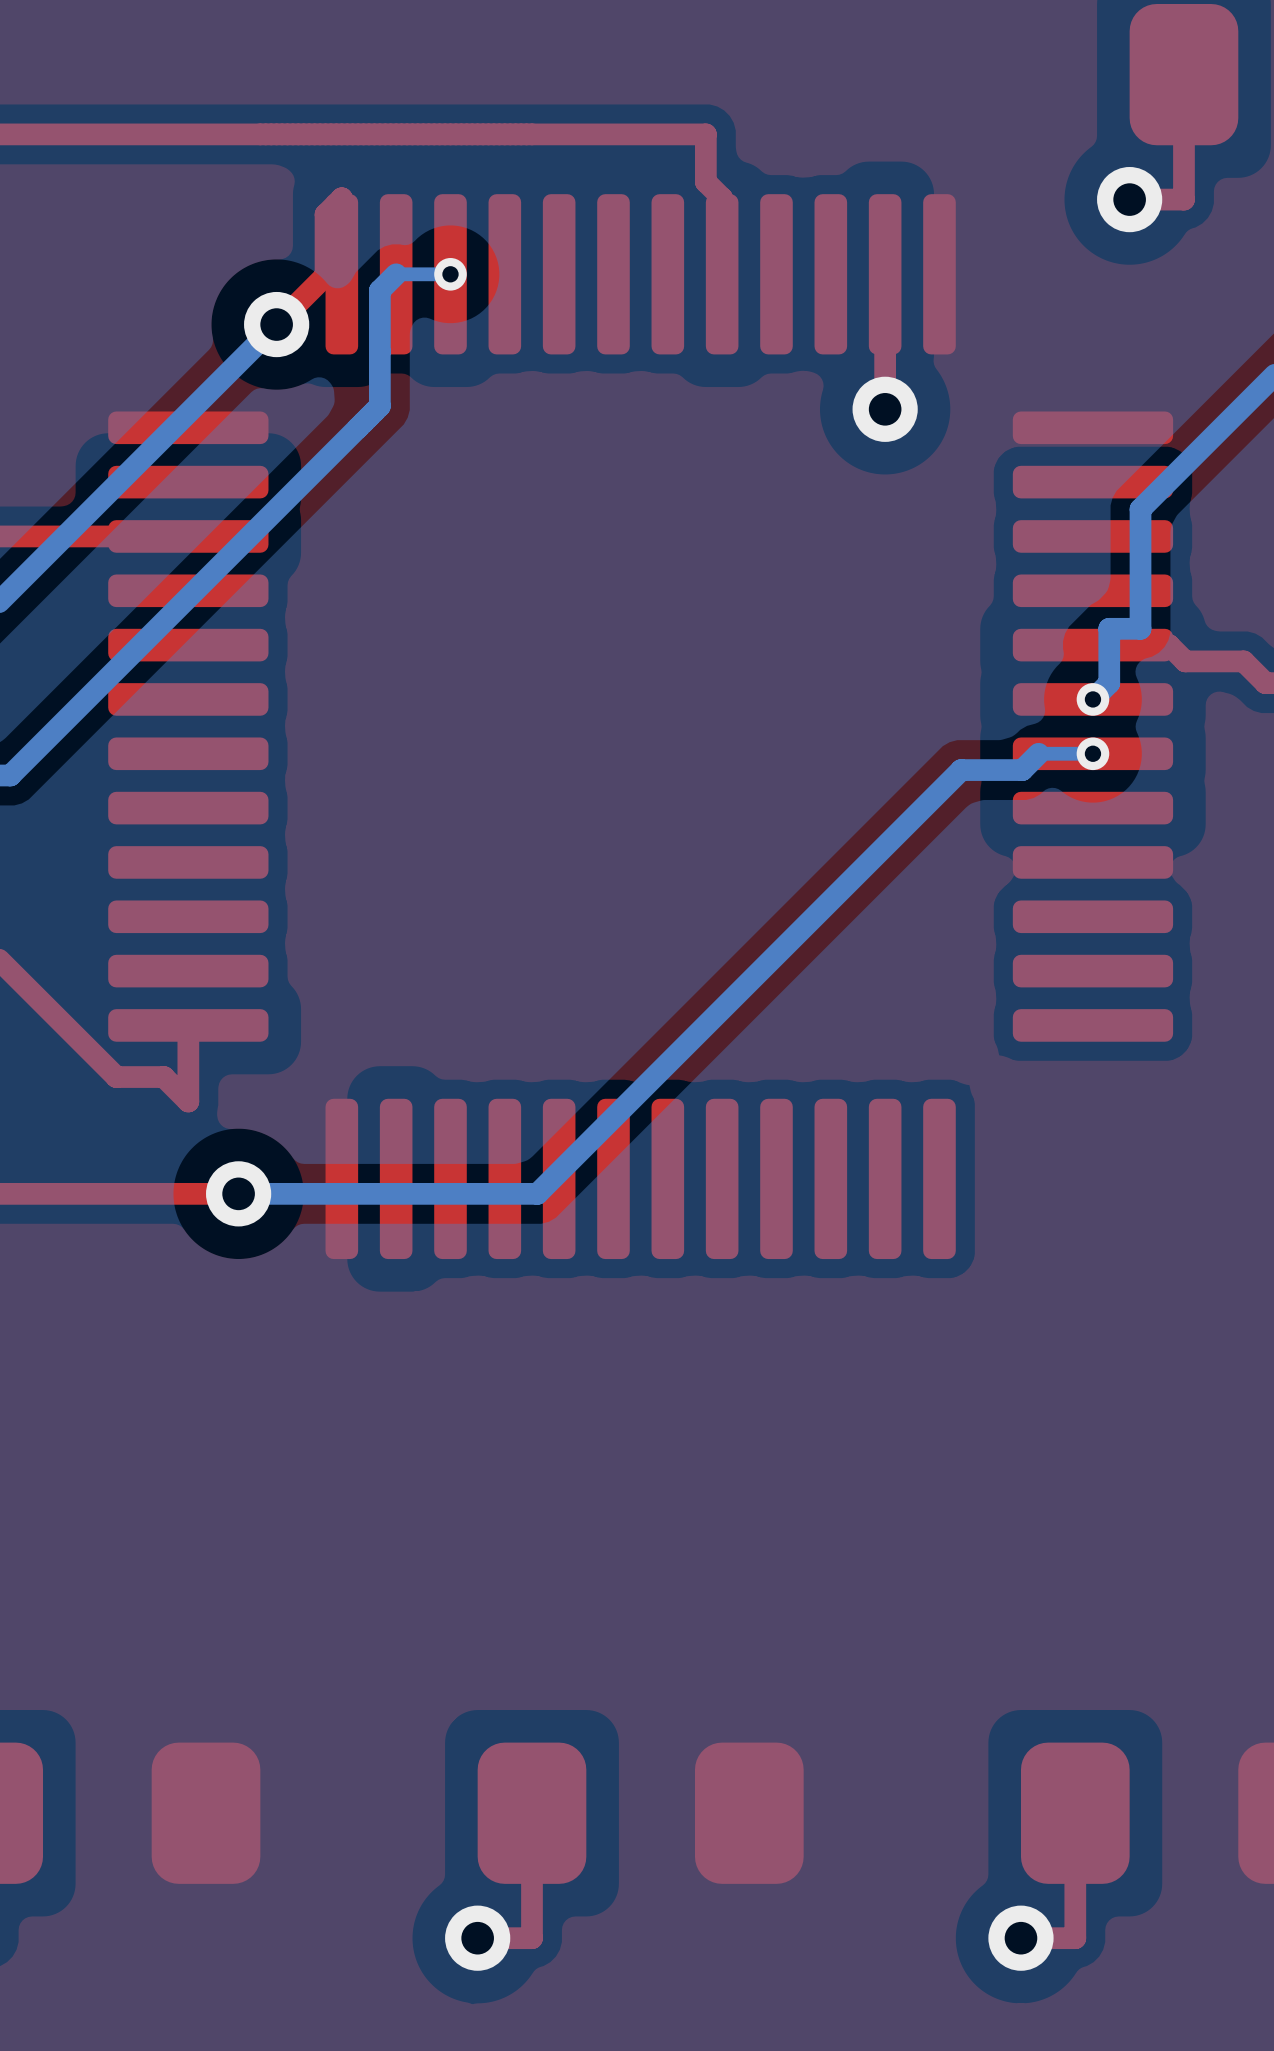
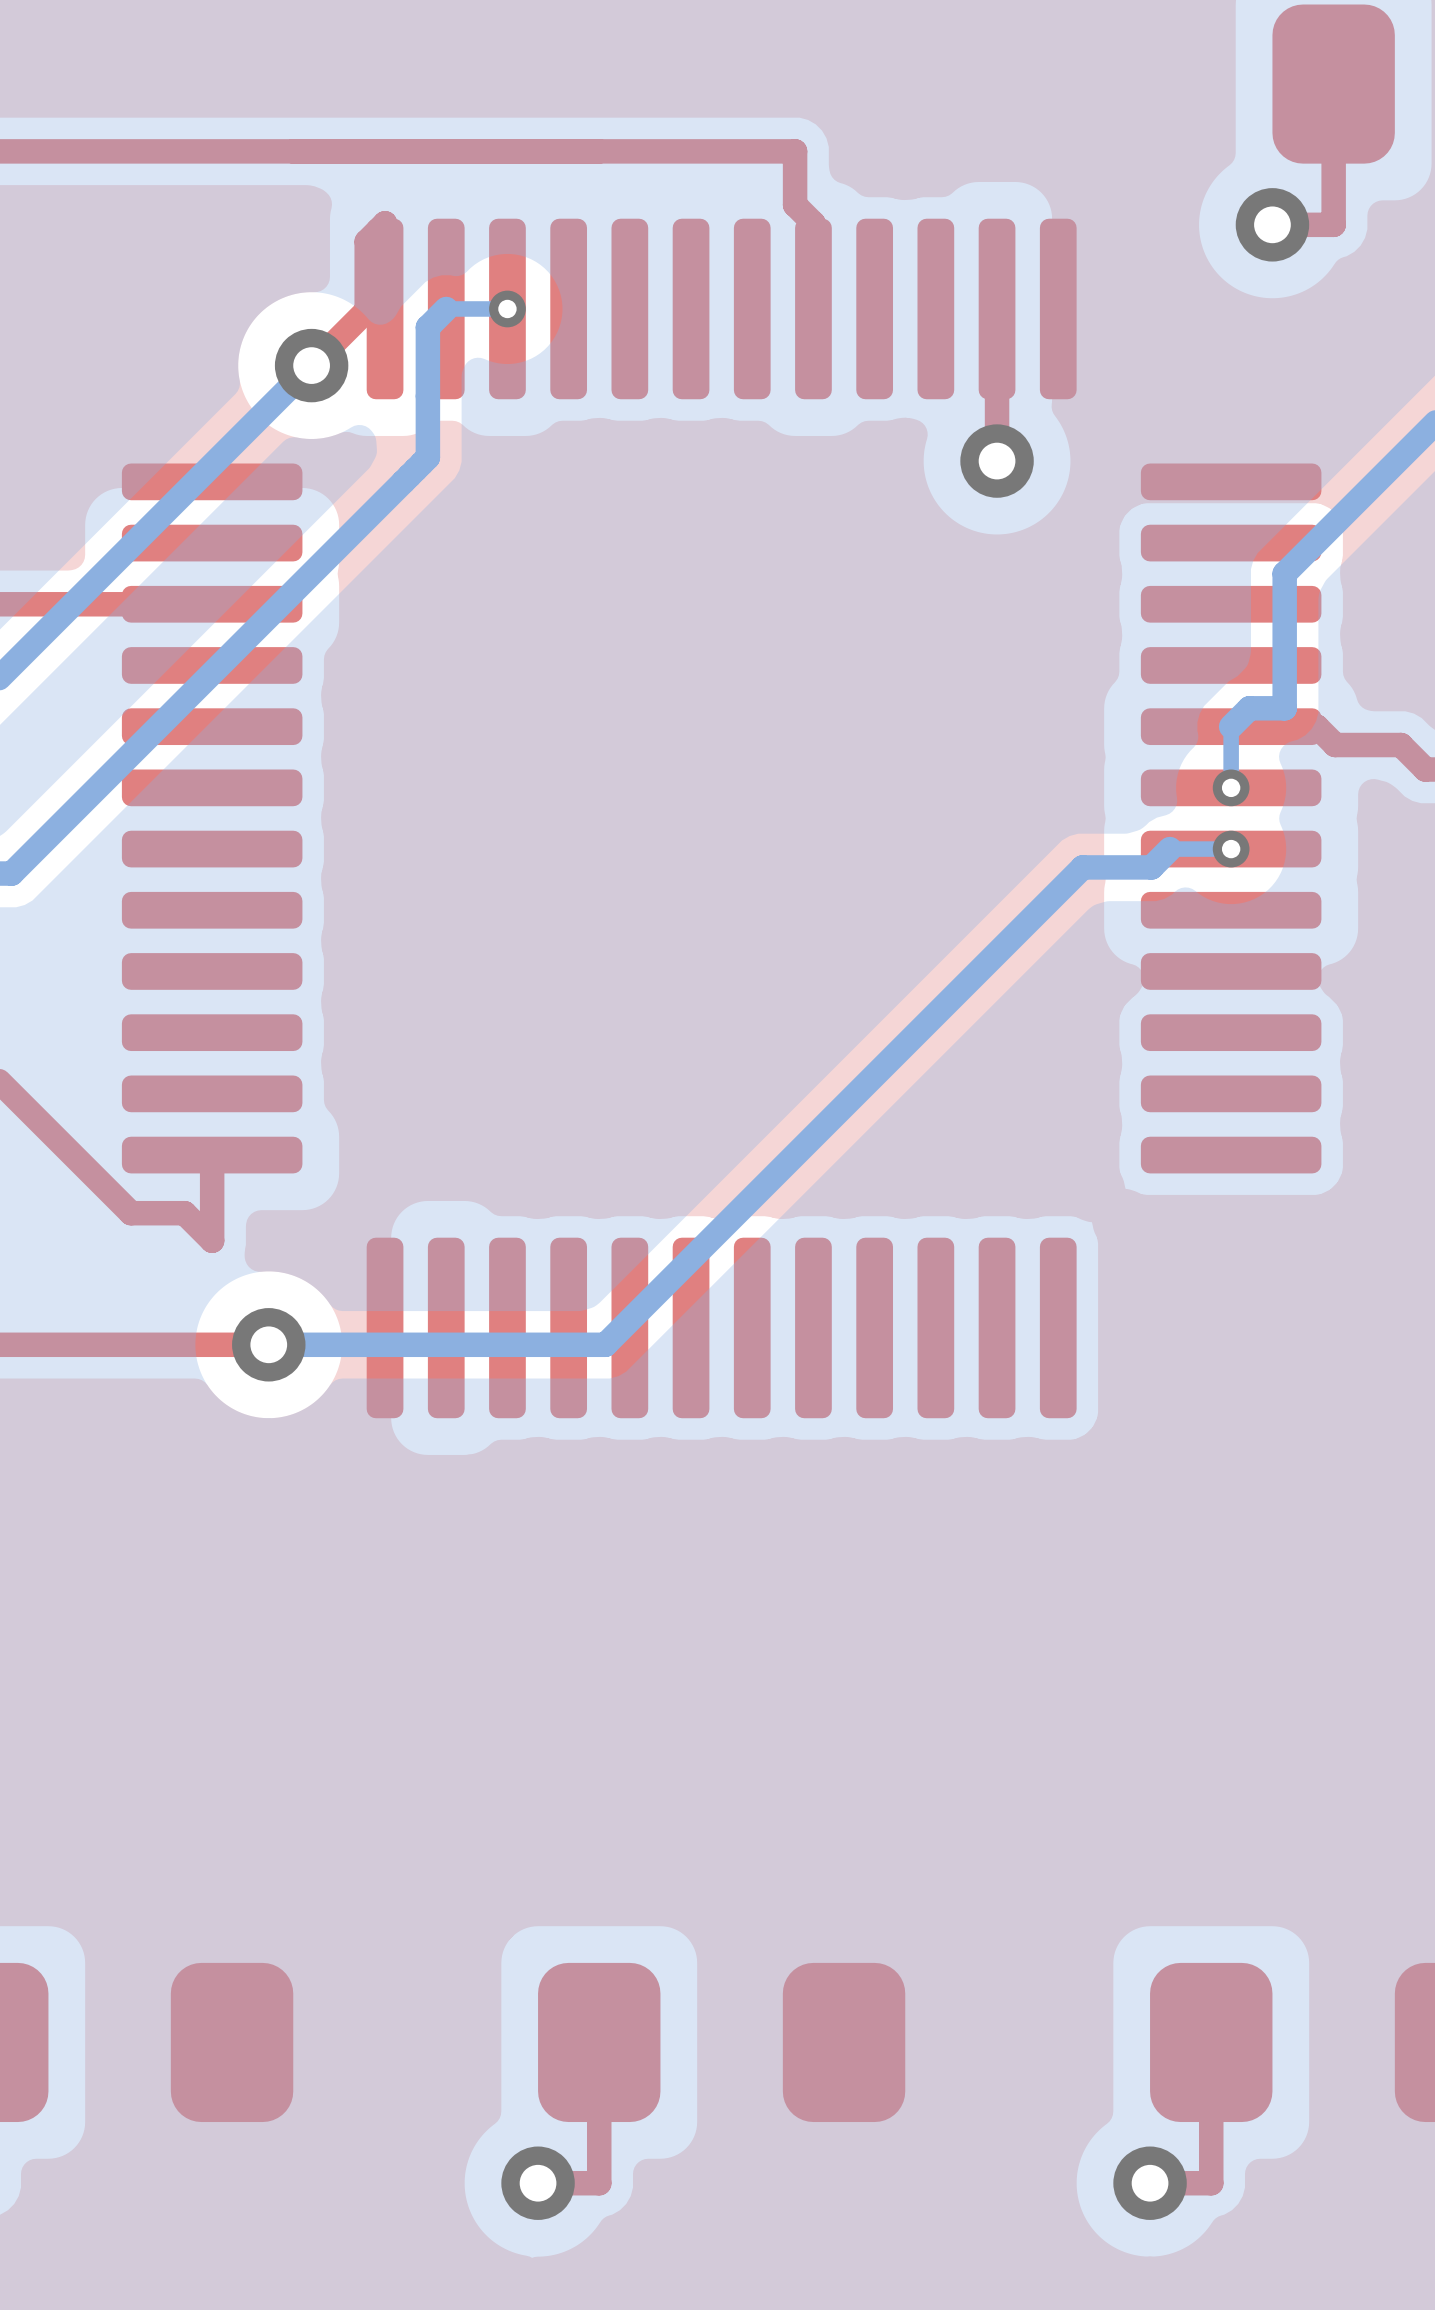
bottom track: (1109, 628) (1109, 683) (1092, 699) -> (1249, 708) (1231, 726) (1231, 787)

